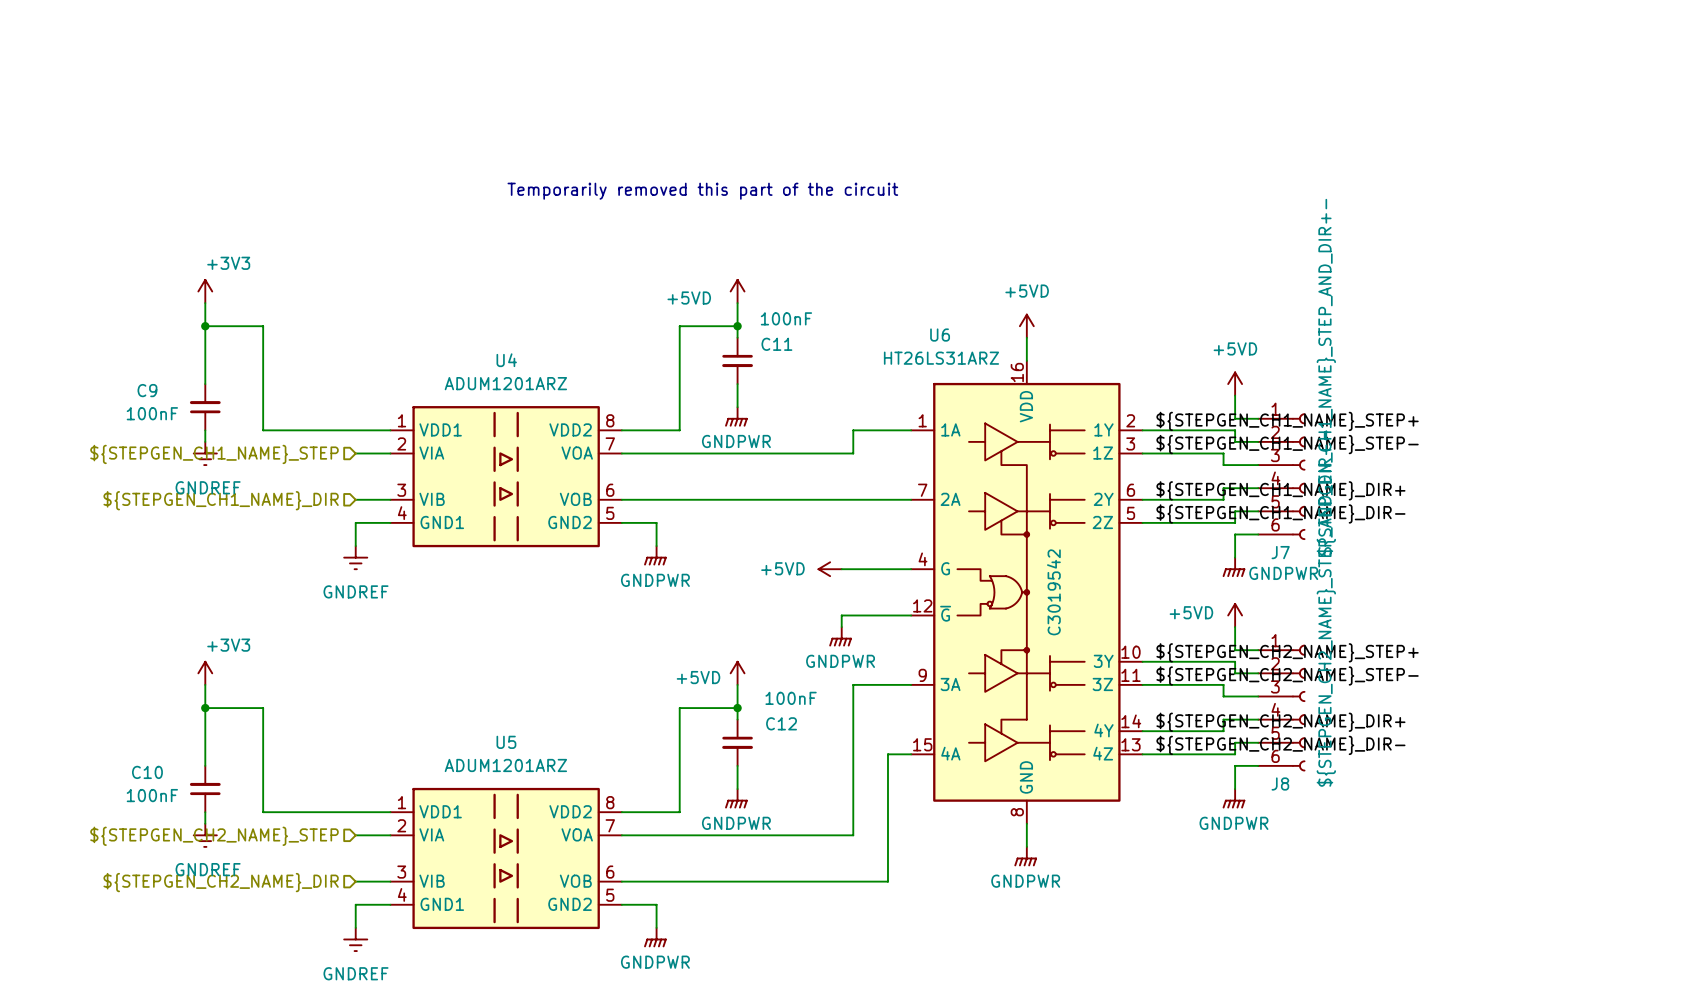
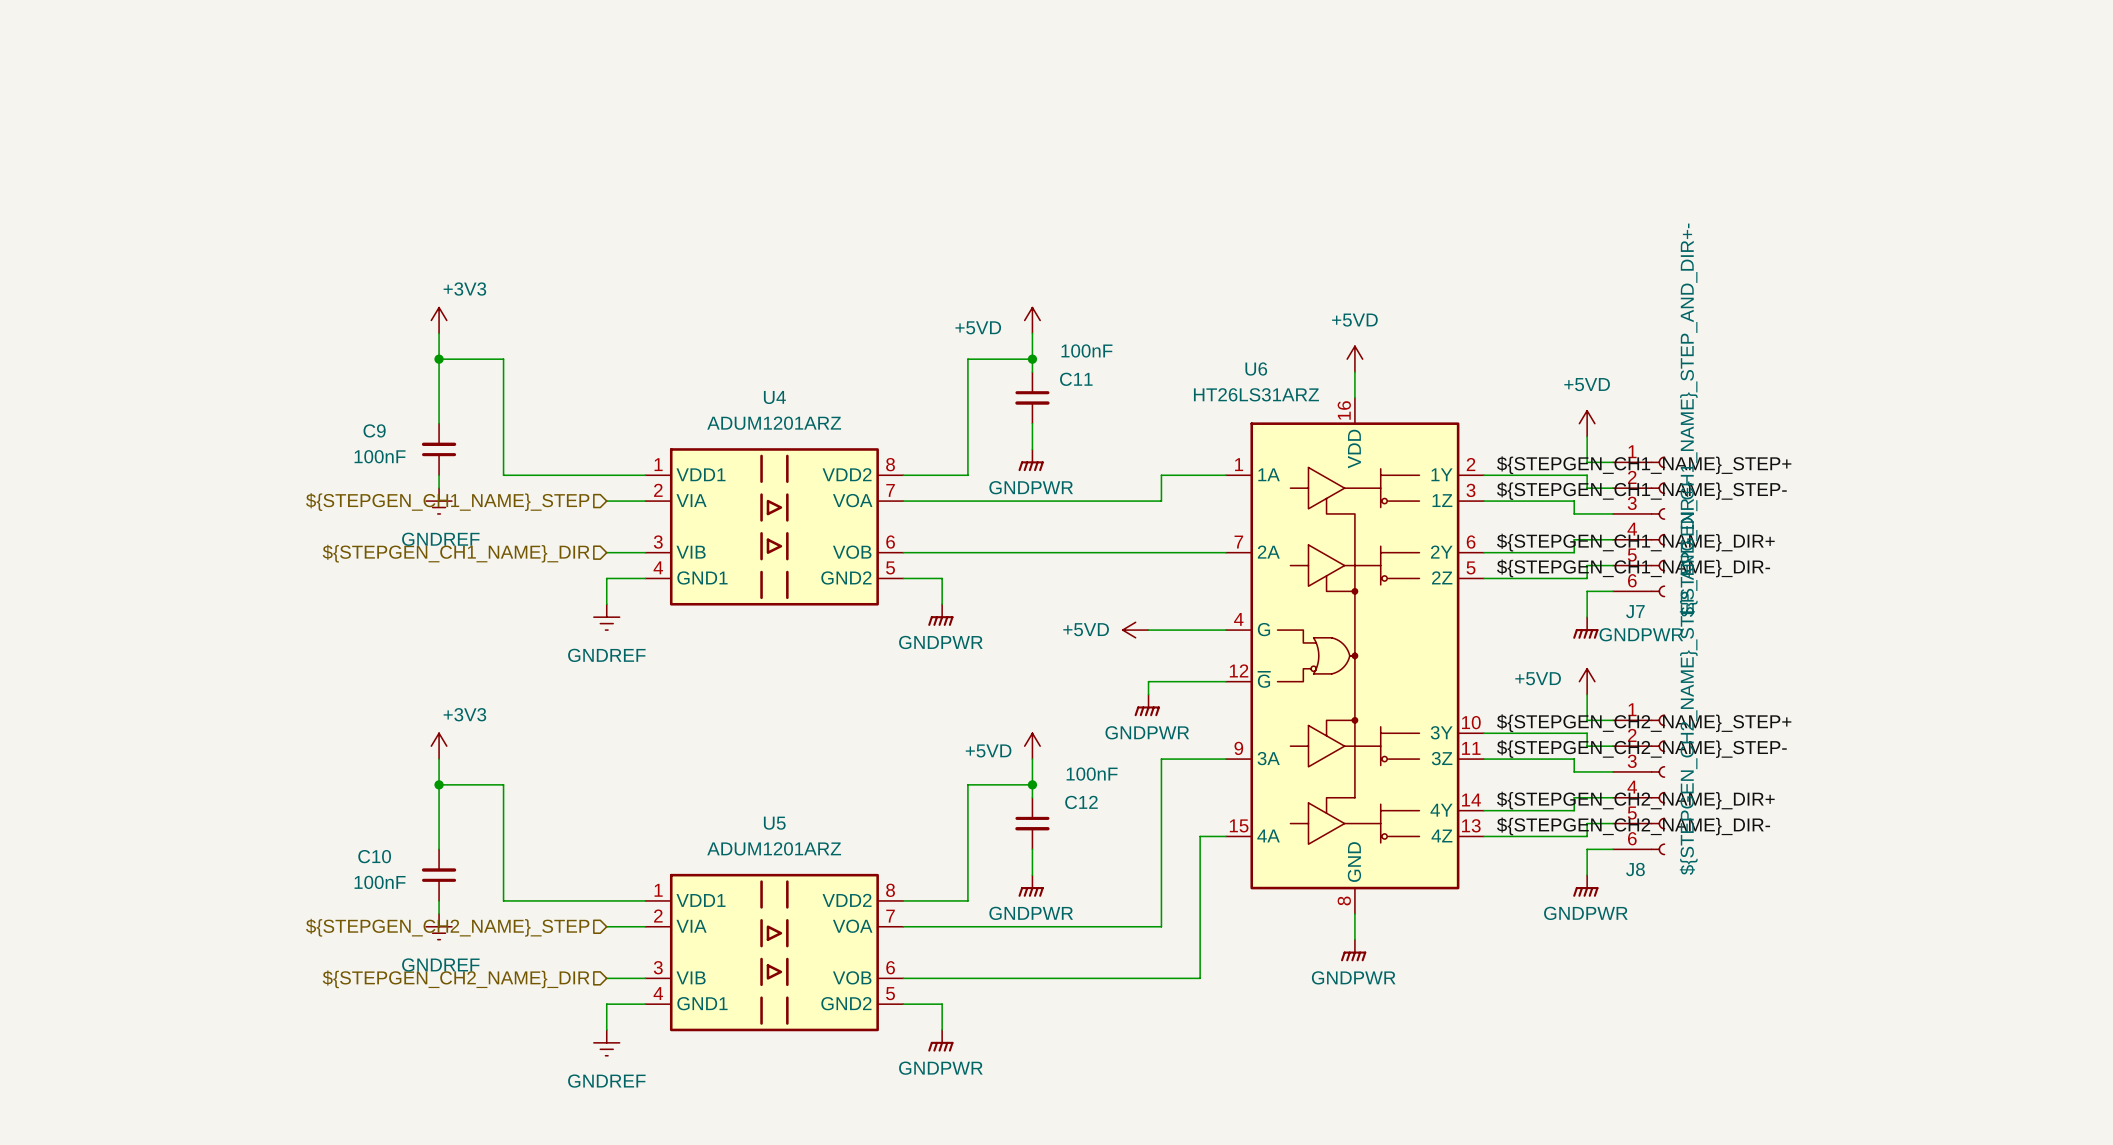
text: Temporarily removed this part of the circuit (702, 191) -> none
U6 text: C3019542 (1053, 592) -> none

